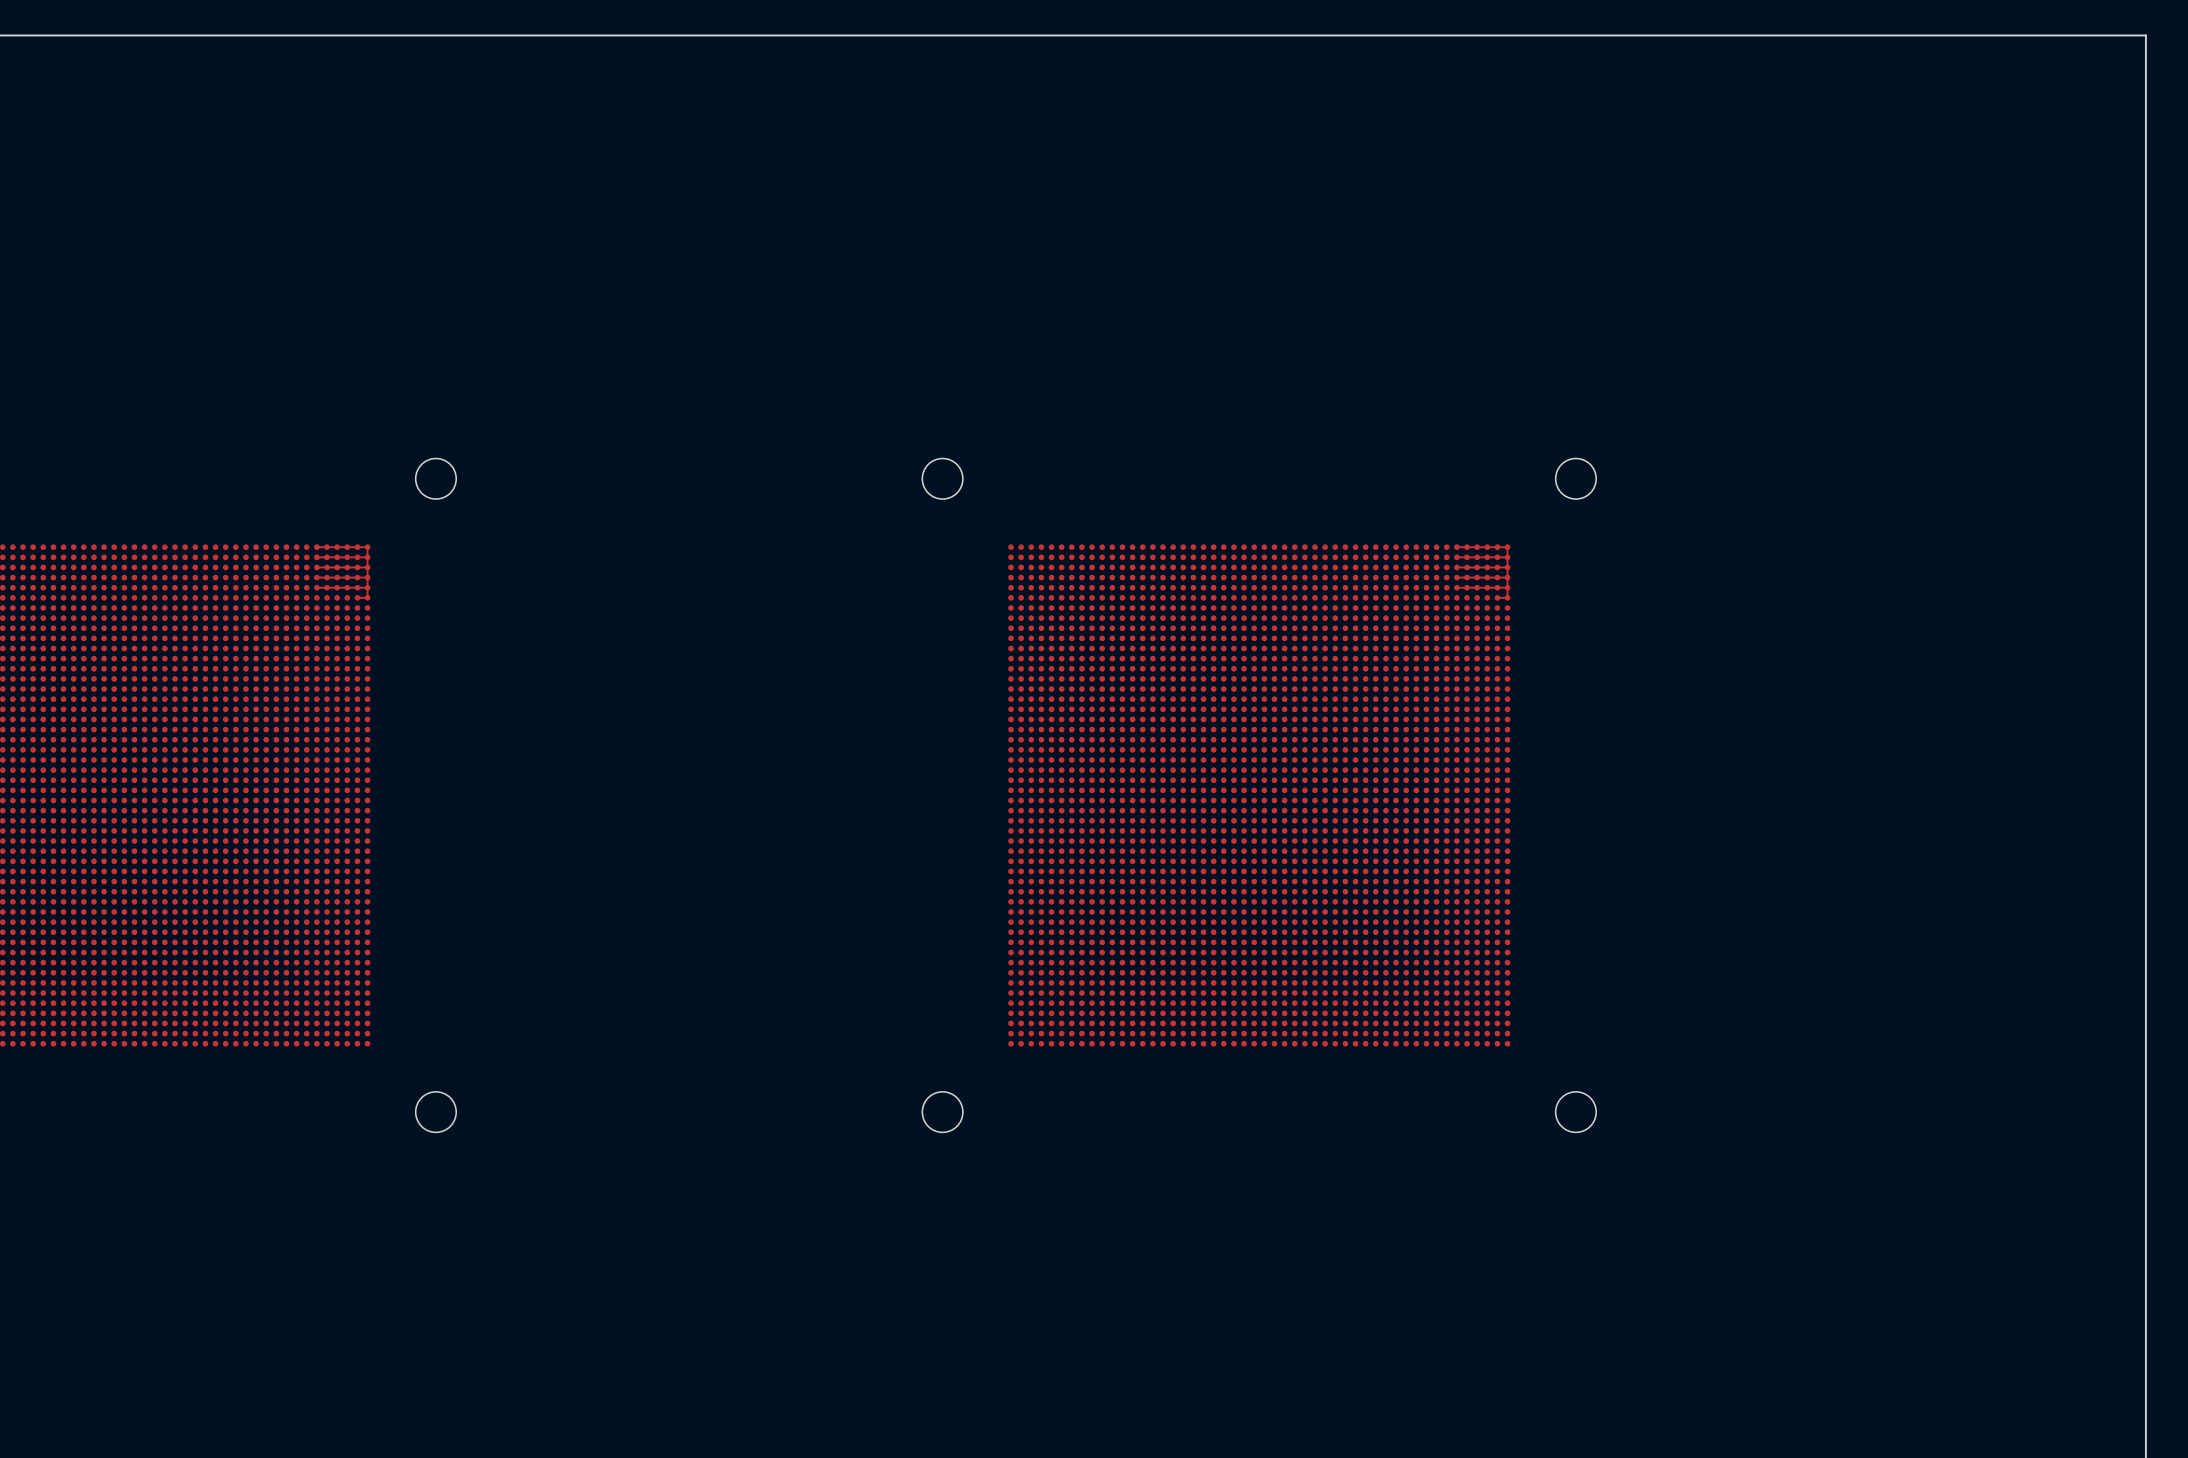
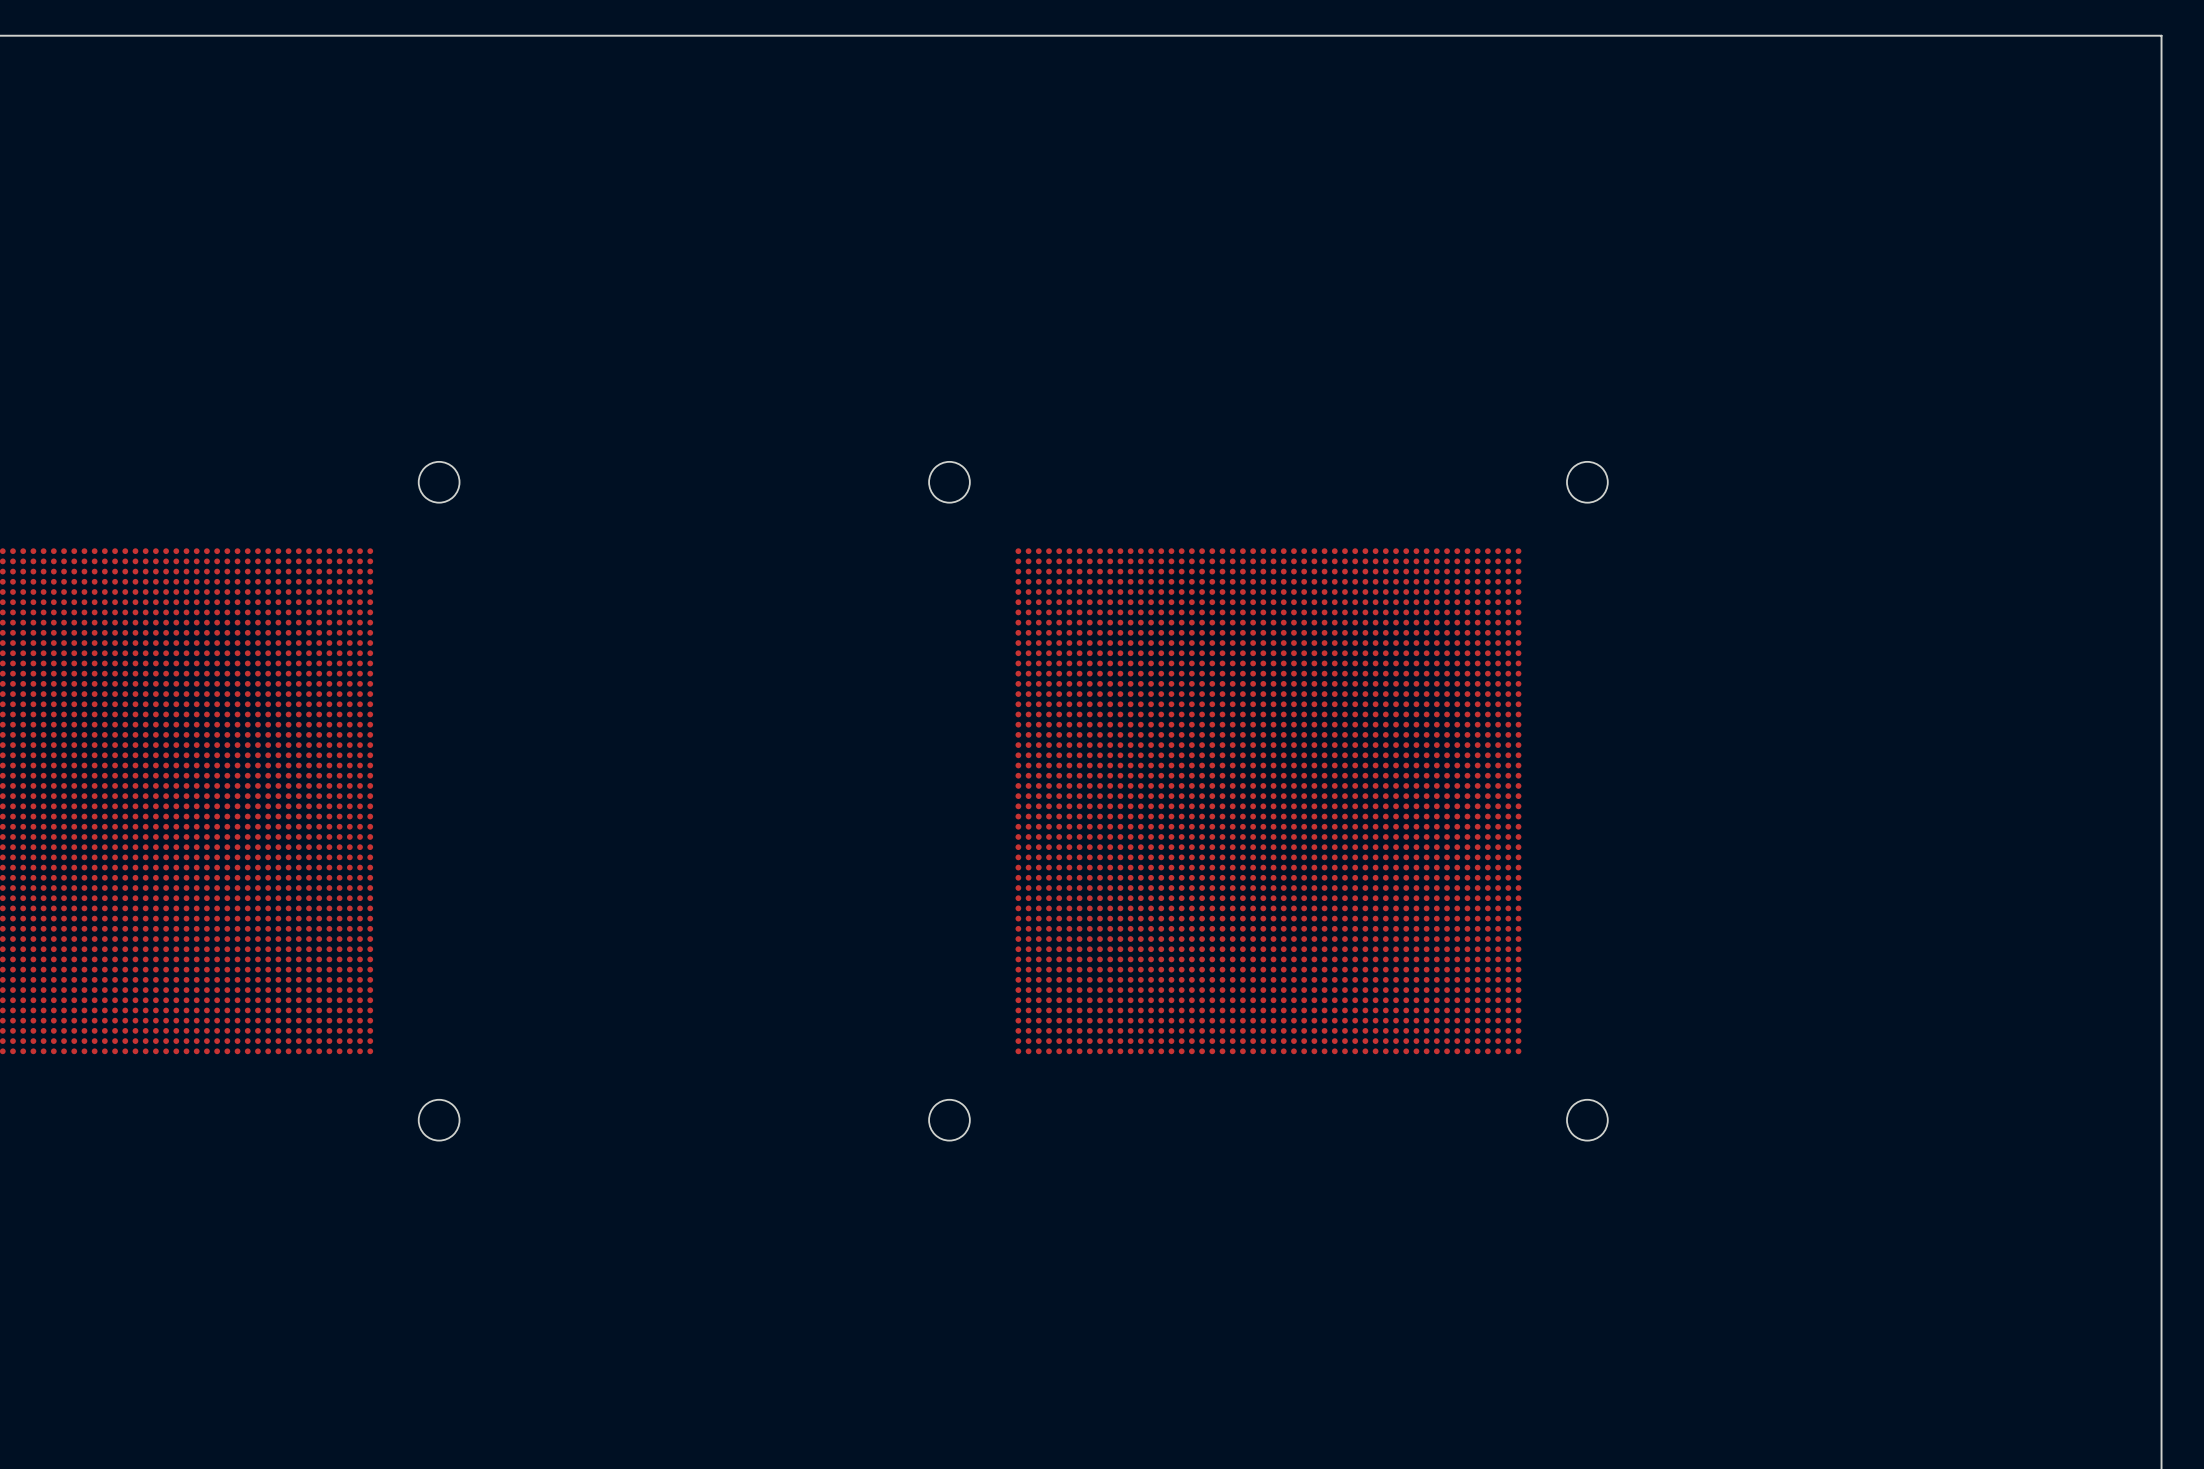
top track: (316, 547) (367, 547) (367, 597) (357, 597) -> none
top track: (1456, 547) (1507, 547) (1507, 597) (1497, 597) -> none
top track: (367, 557) (316, 557) -> none
top track: (1507, 557) (1456, 557) -> none
top track: (367, 567) (316, 567) -> none
top track: (1507, 567) (1456, 567) -> none
top track: (367, 577) (316, 577) -> none
top track: (1507, 577) (1456, 577) -> none
top track: (367, 587) (316, 587) -> none
top track: (1507, 587) (1456, 587) -> none

